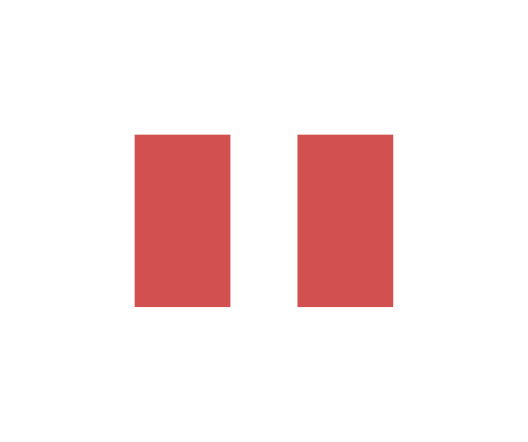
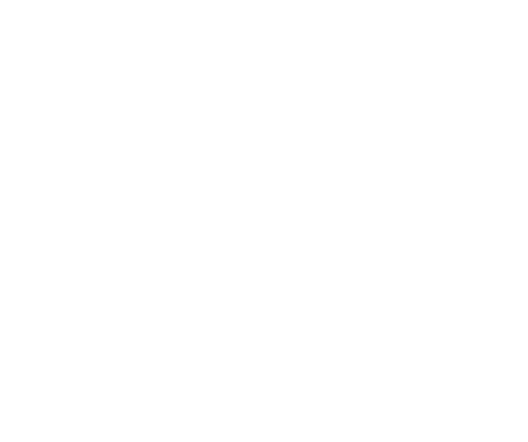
part: (263, 220) -> none

